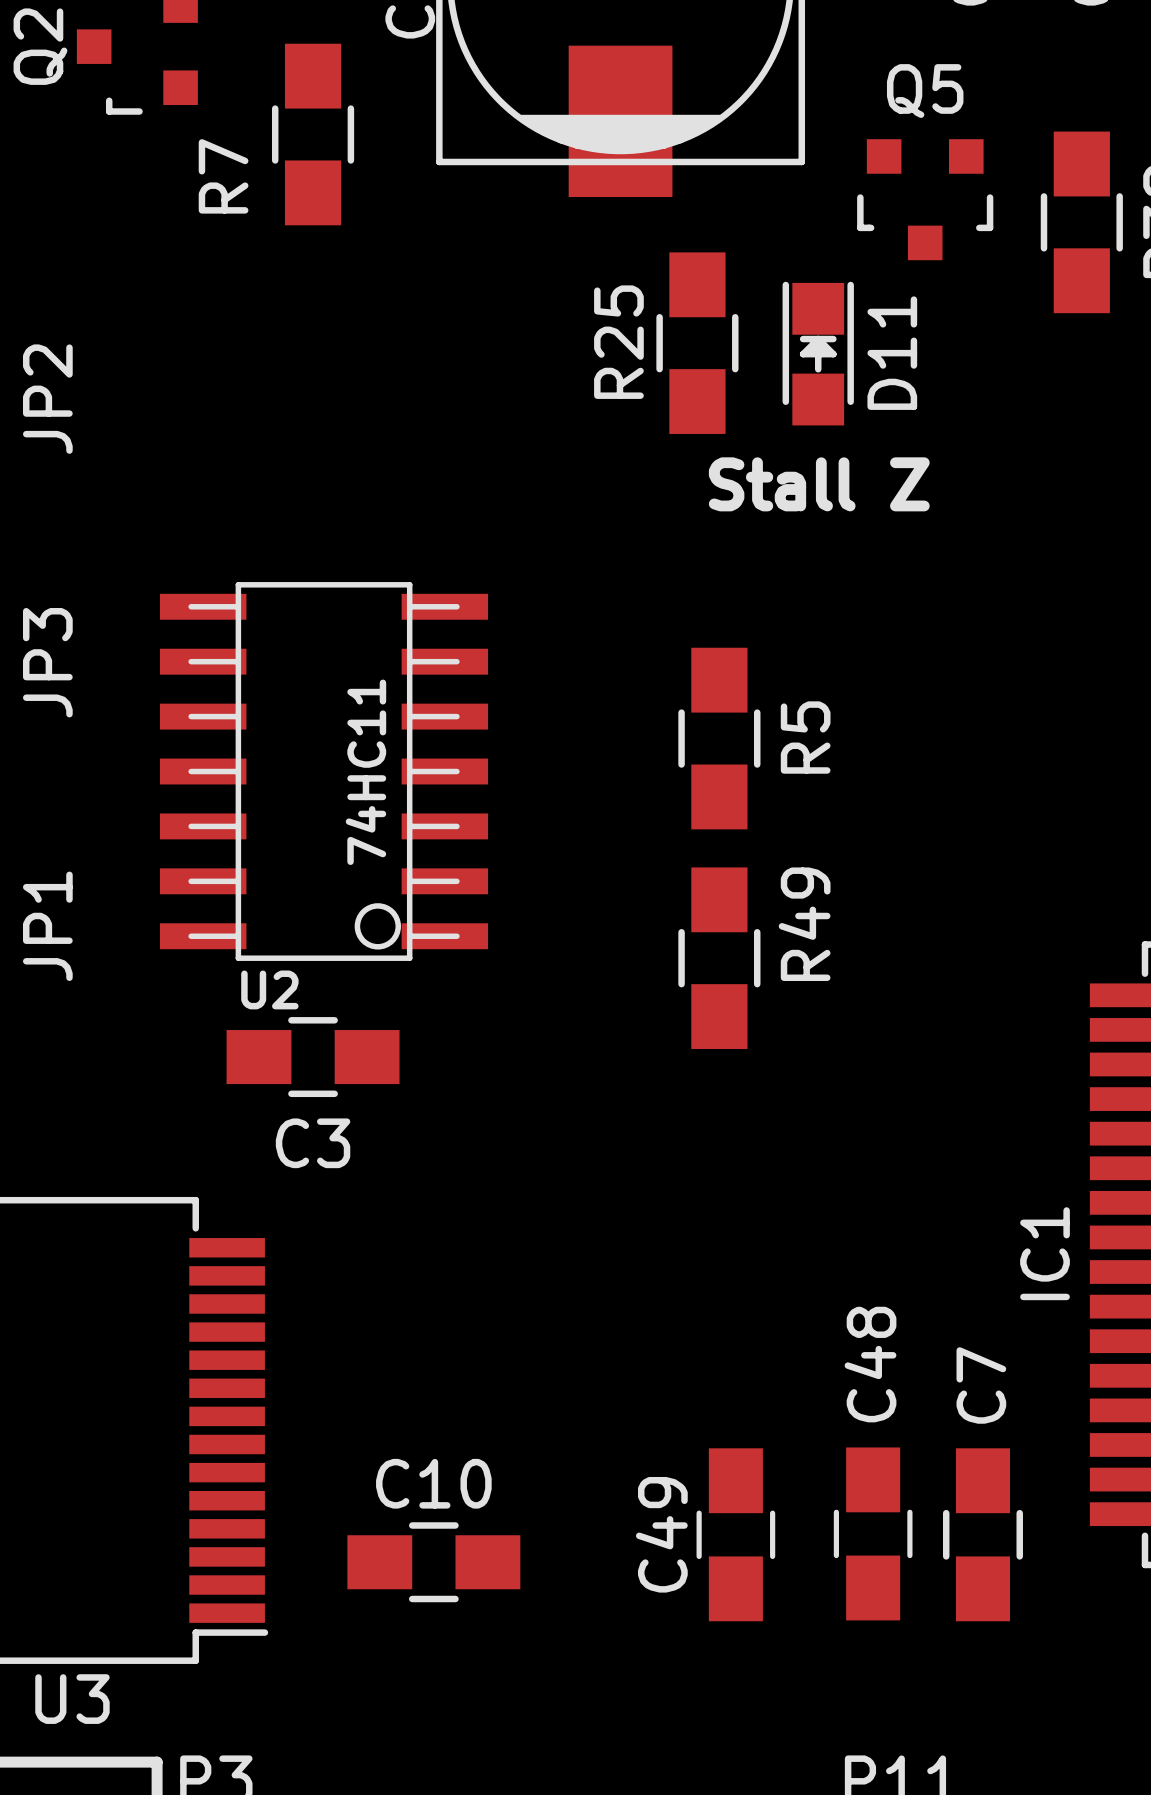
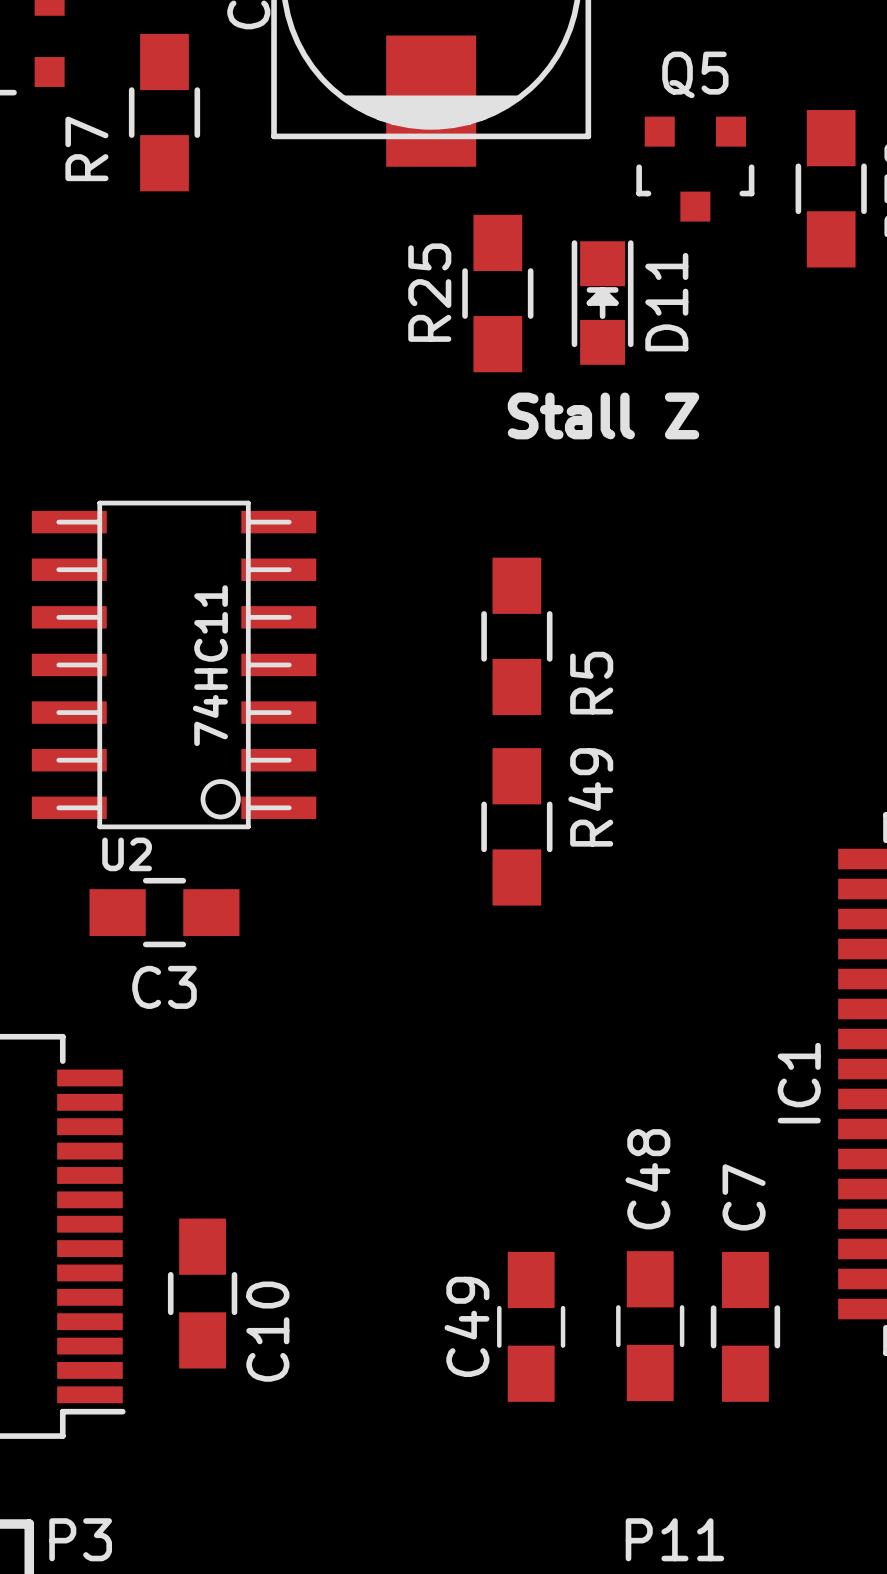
R5 name position: R5 (805, 737) -> R5 (591, 683)
C10 rotation: 0° (433, 1562) -> 90° clockwise (202, 1293)

